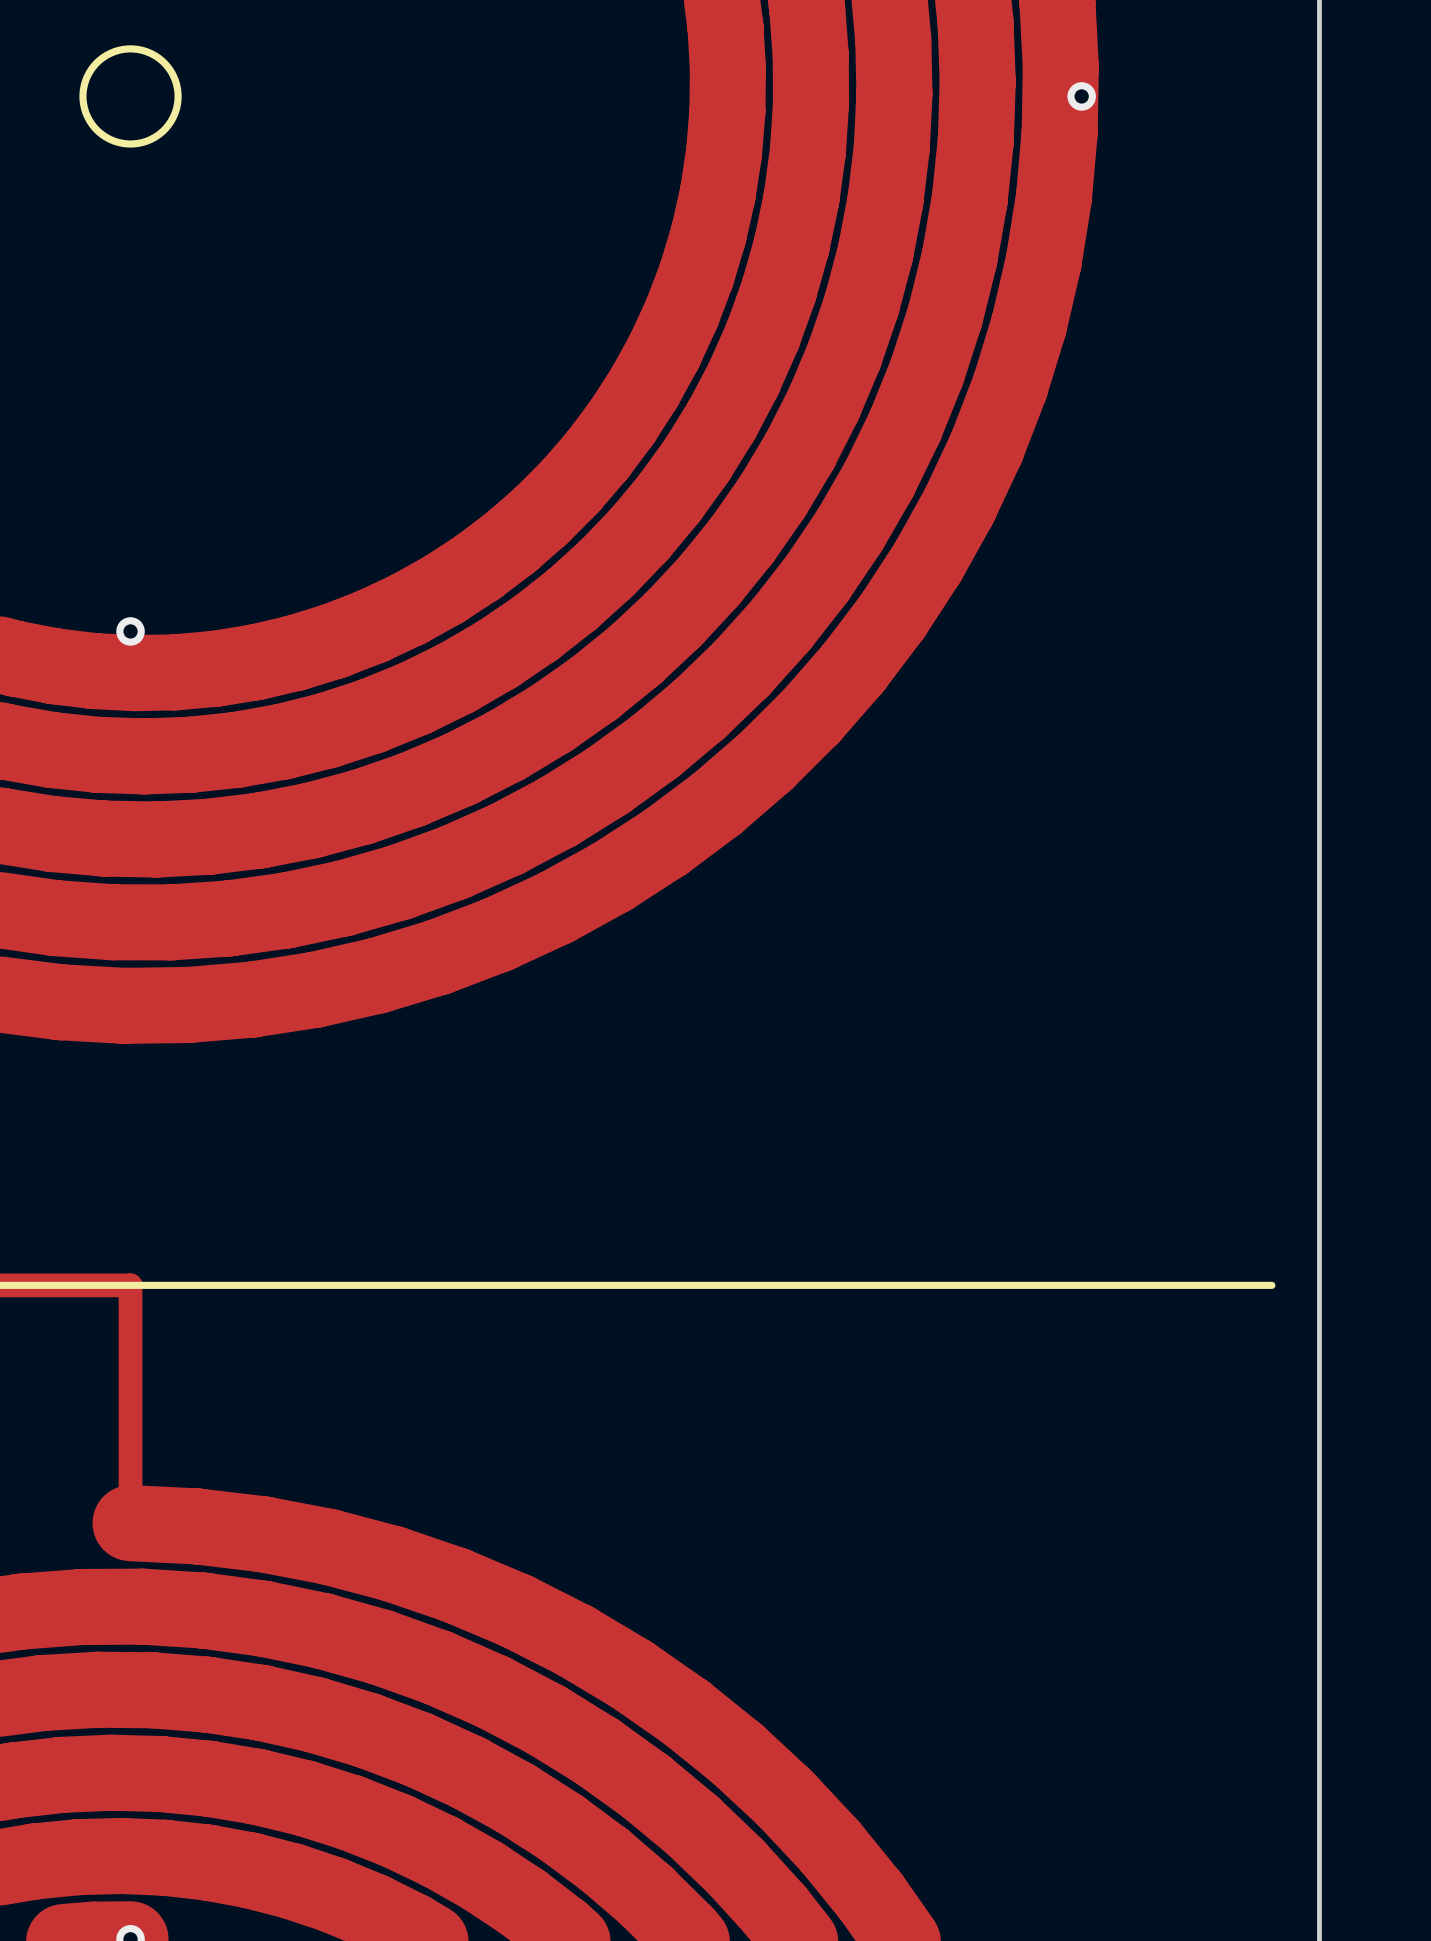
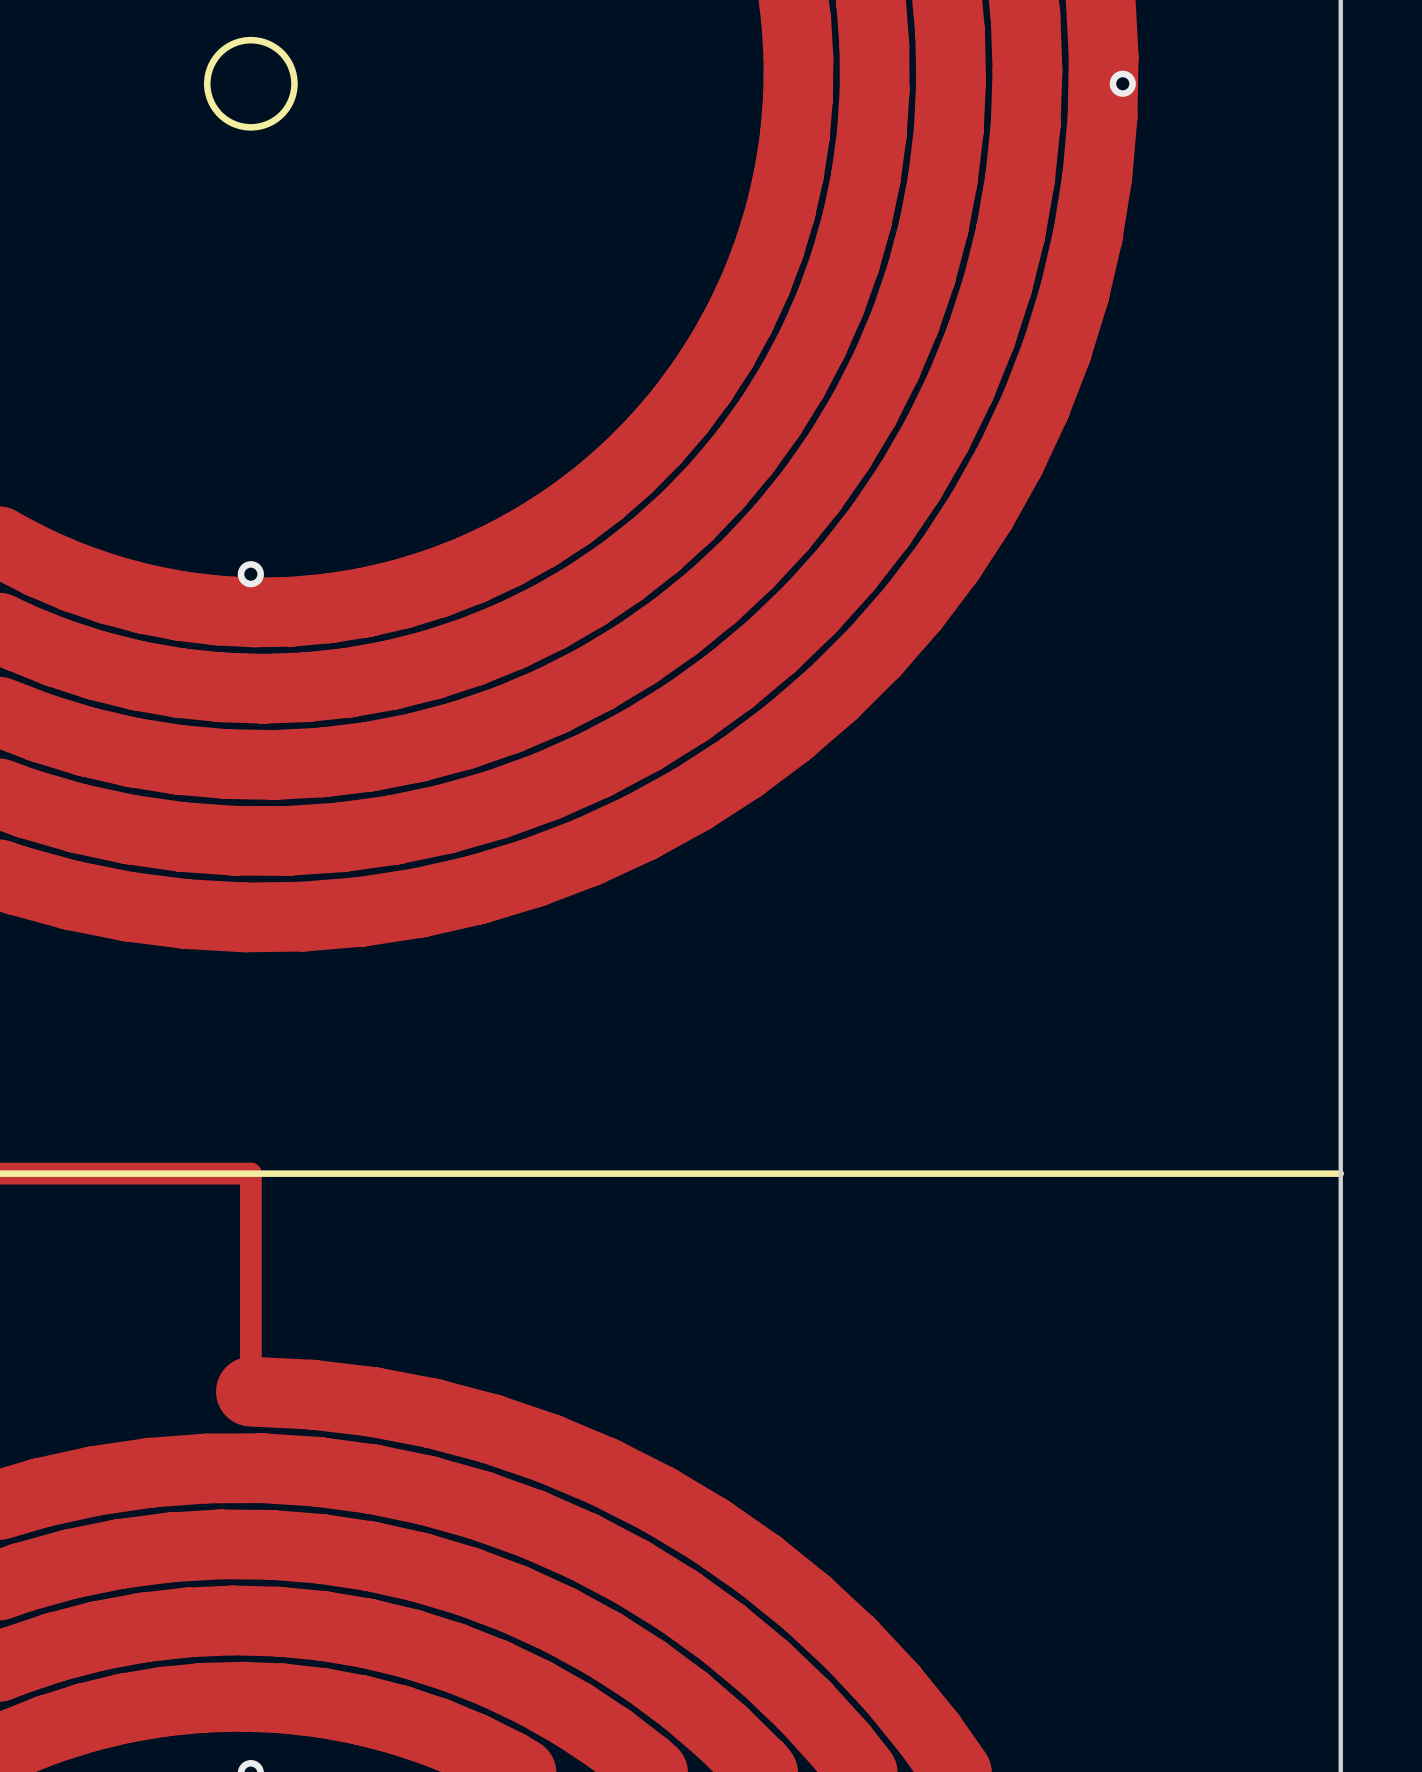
line: none -> (1297, 1173) (1340, 1173)

